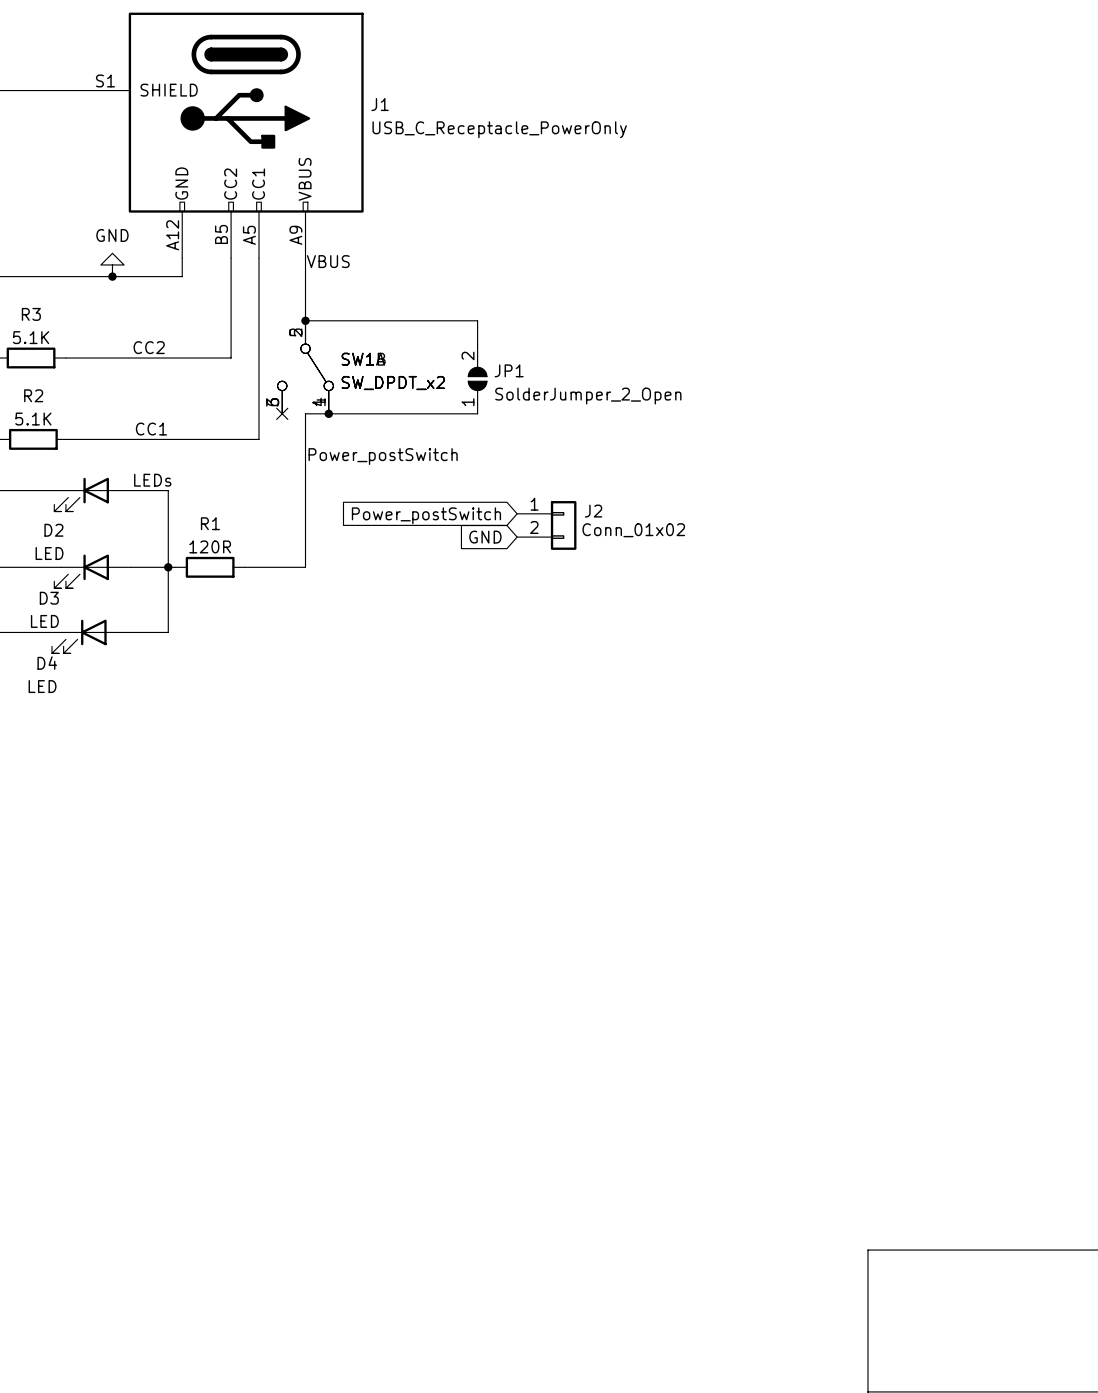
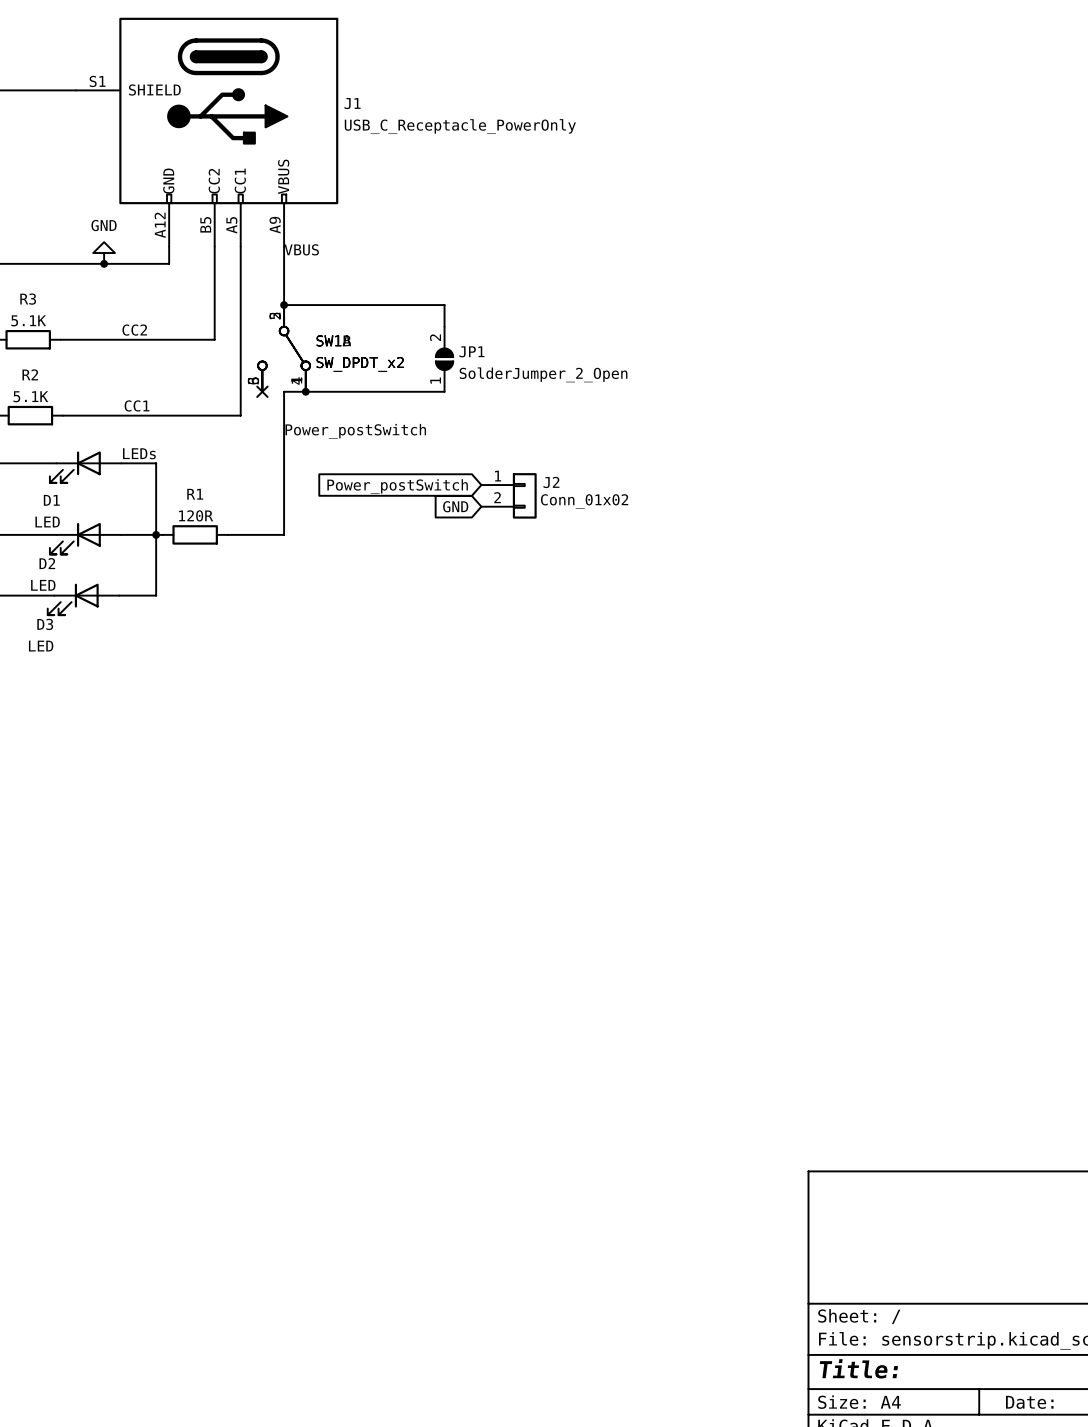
D2 name: D2 (53, 530) -> D1 (51, 500)
D3 name: D3 (49, 598) -> D2 (47, 563)
D4 name: D4 (47, 663) -> D3 (45, 624)

